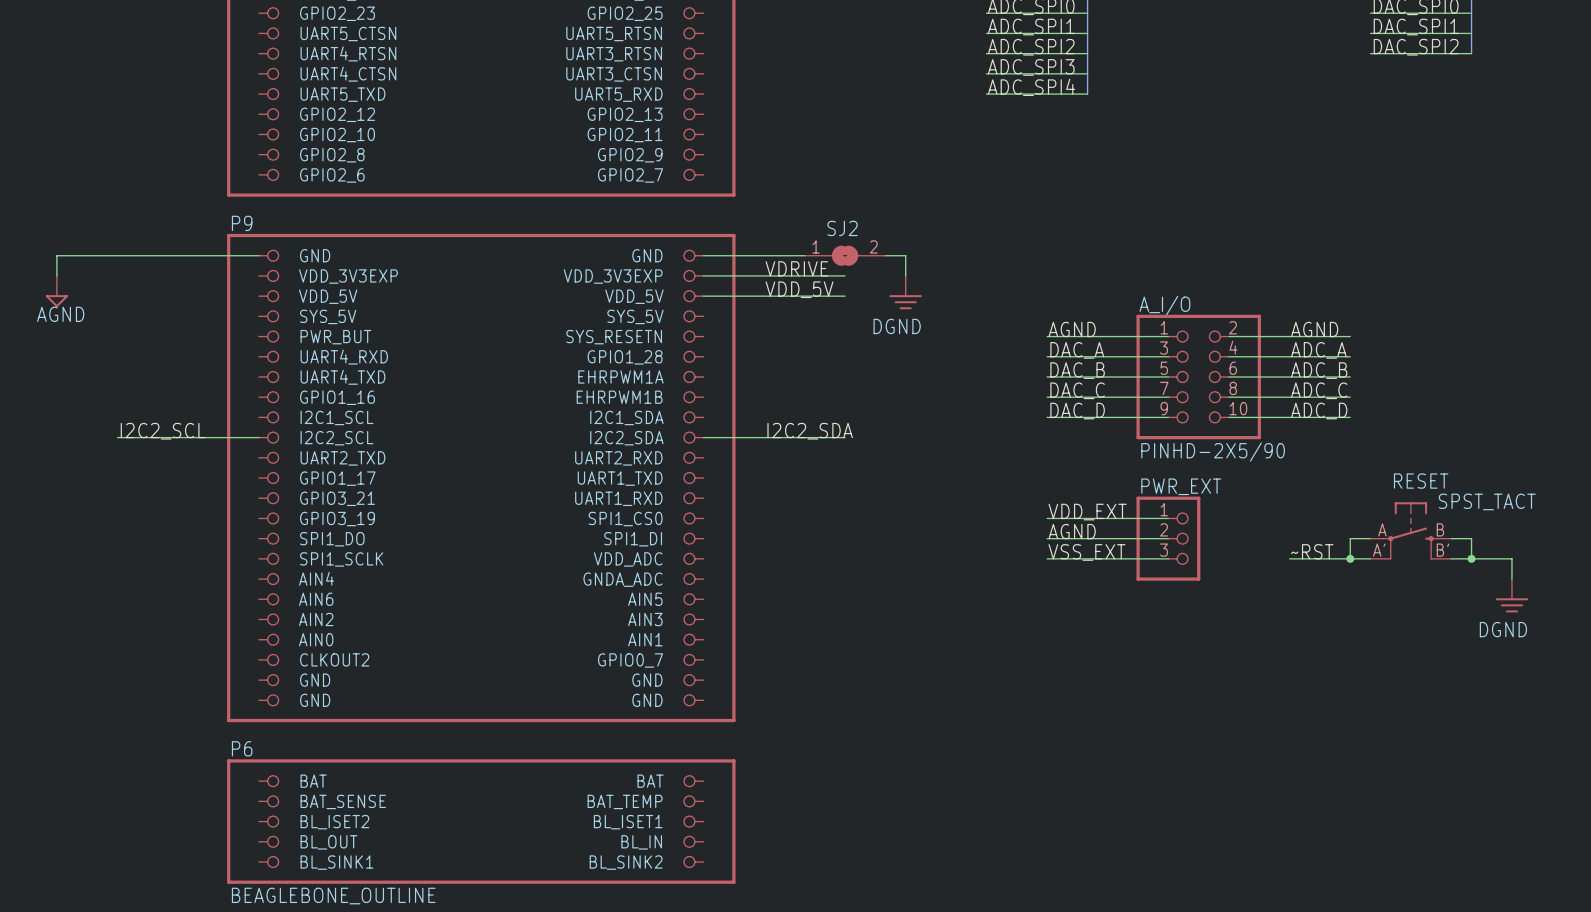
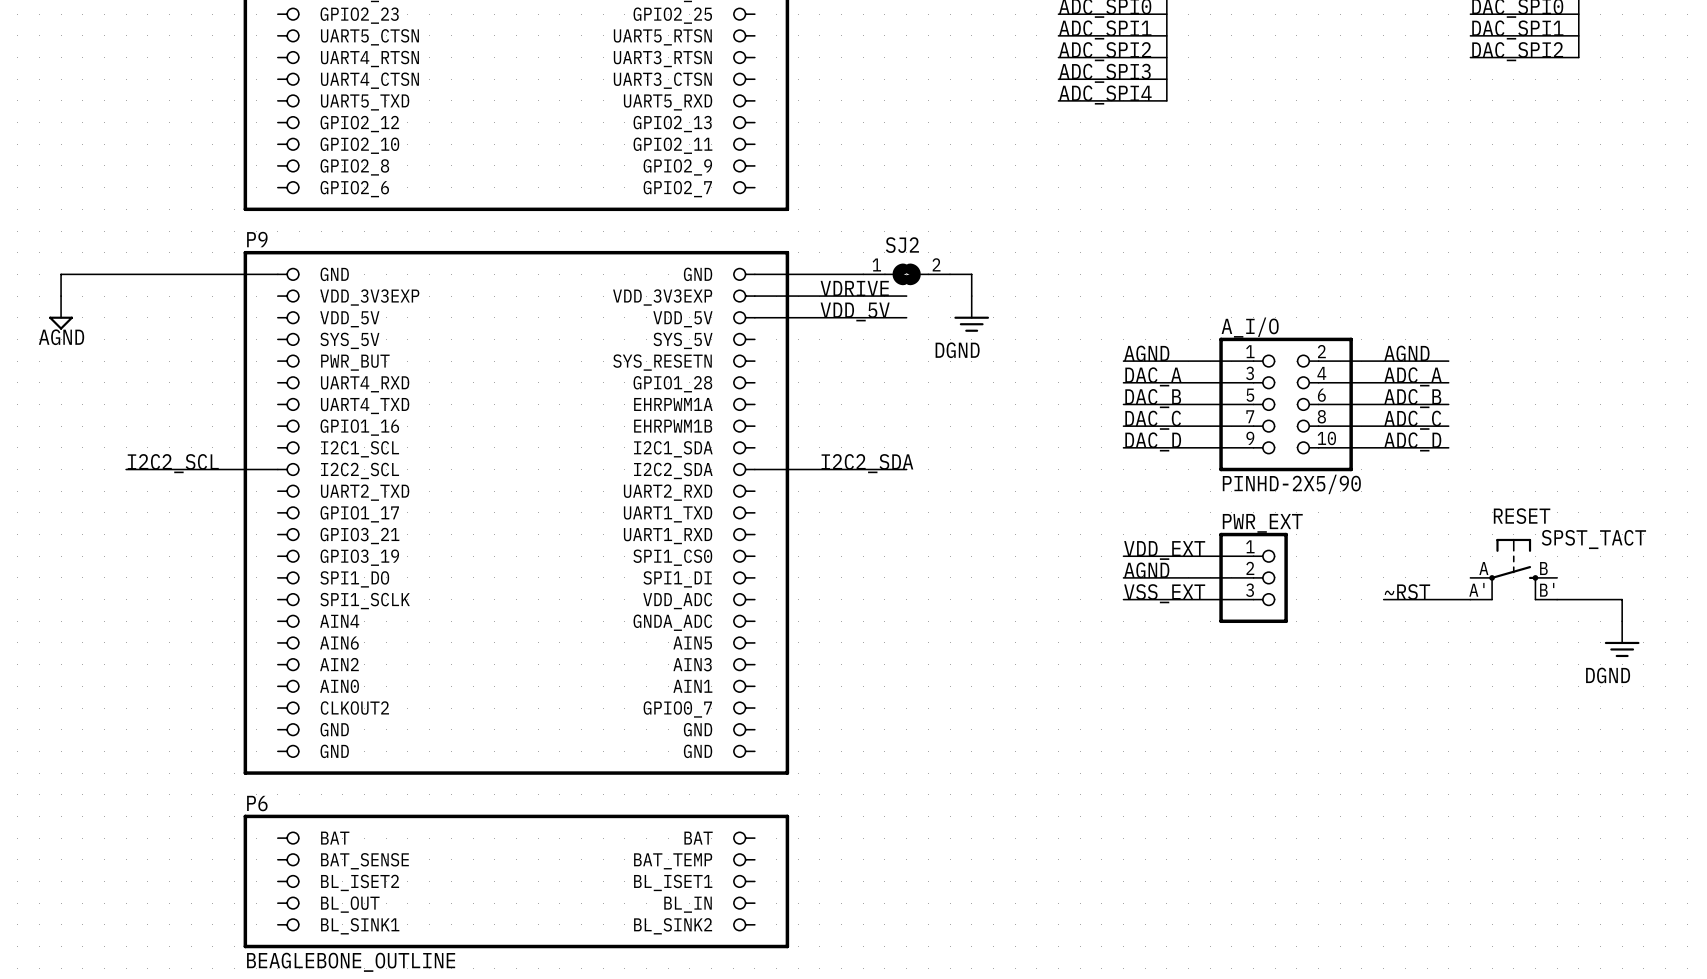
wire: (1370, 538) (1350, 538) (1350, 558) -> none
wire: (1451, 538) (1471, 538) (1471, 558) -> none
junction: (1350, 558) -> none
junction: (1471, 558) -> none

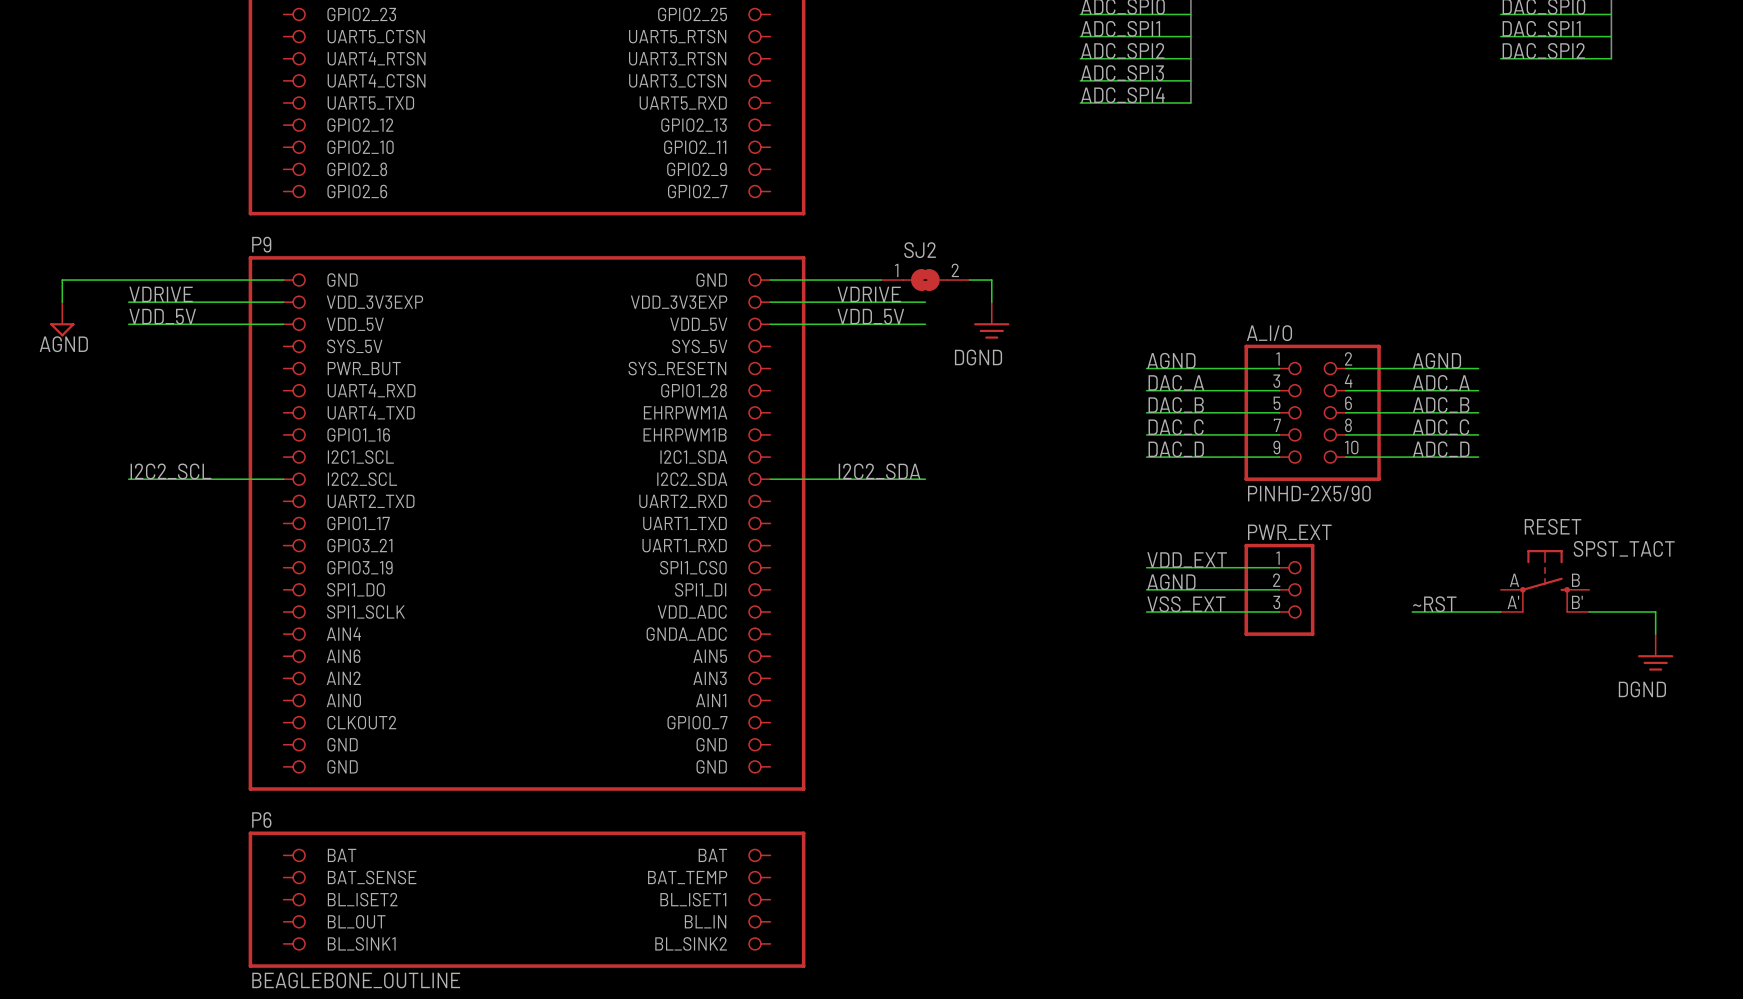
label: none -> VDRIVE (161, 294)
wire: none -> (128, 302) (283, 302)
label: none -> VDD_5V (162, 316)
wire: none -> (128, 324) (283, 324)

